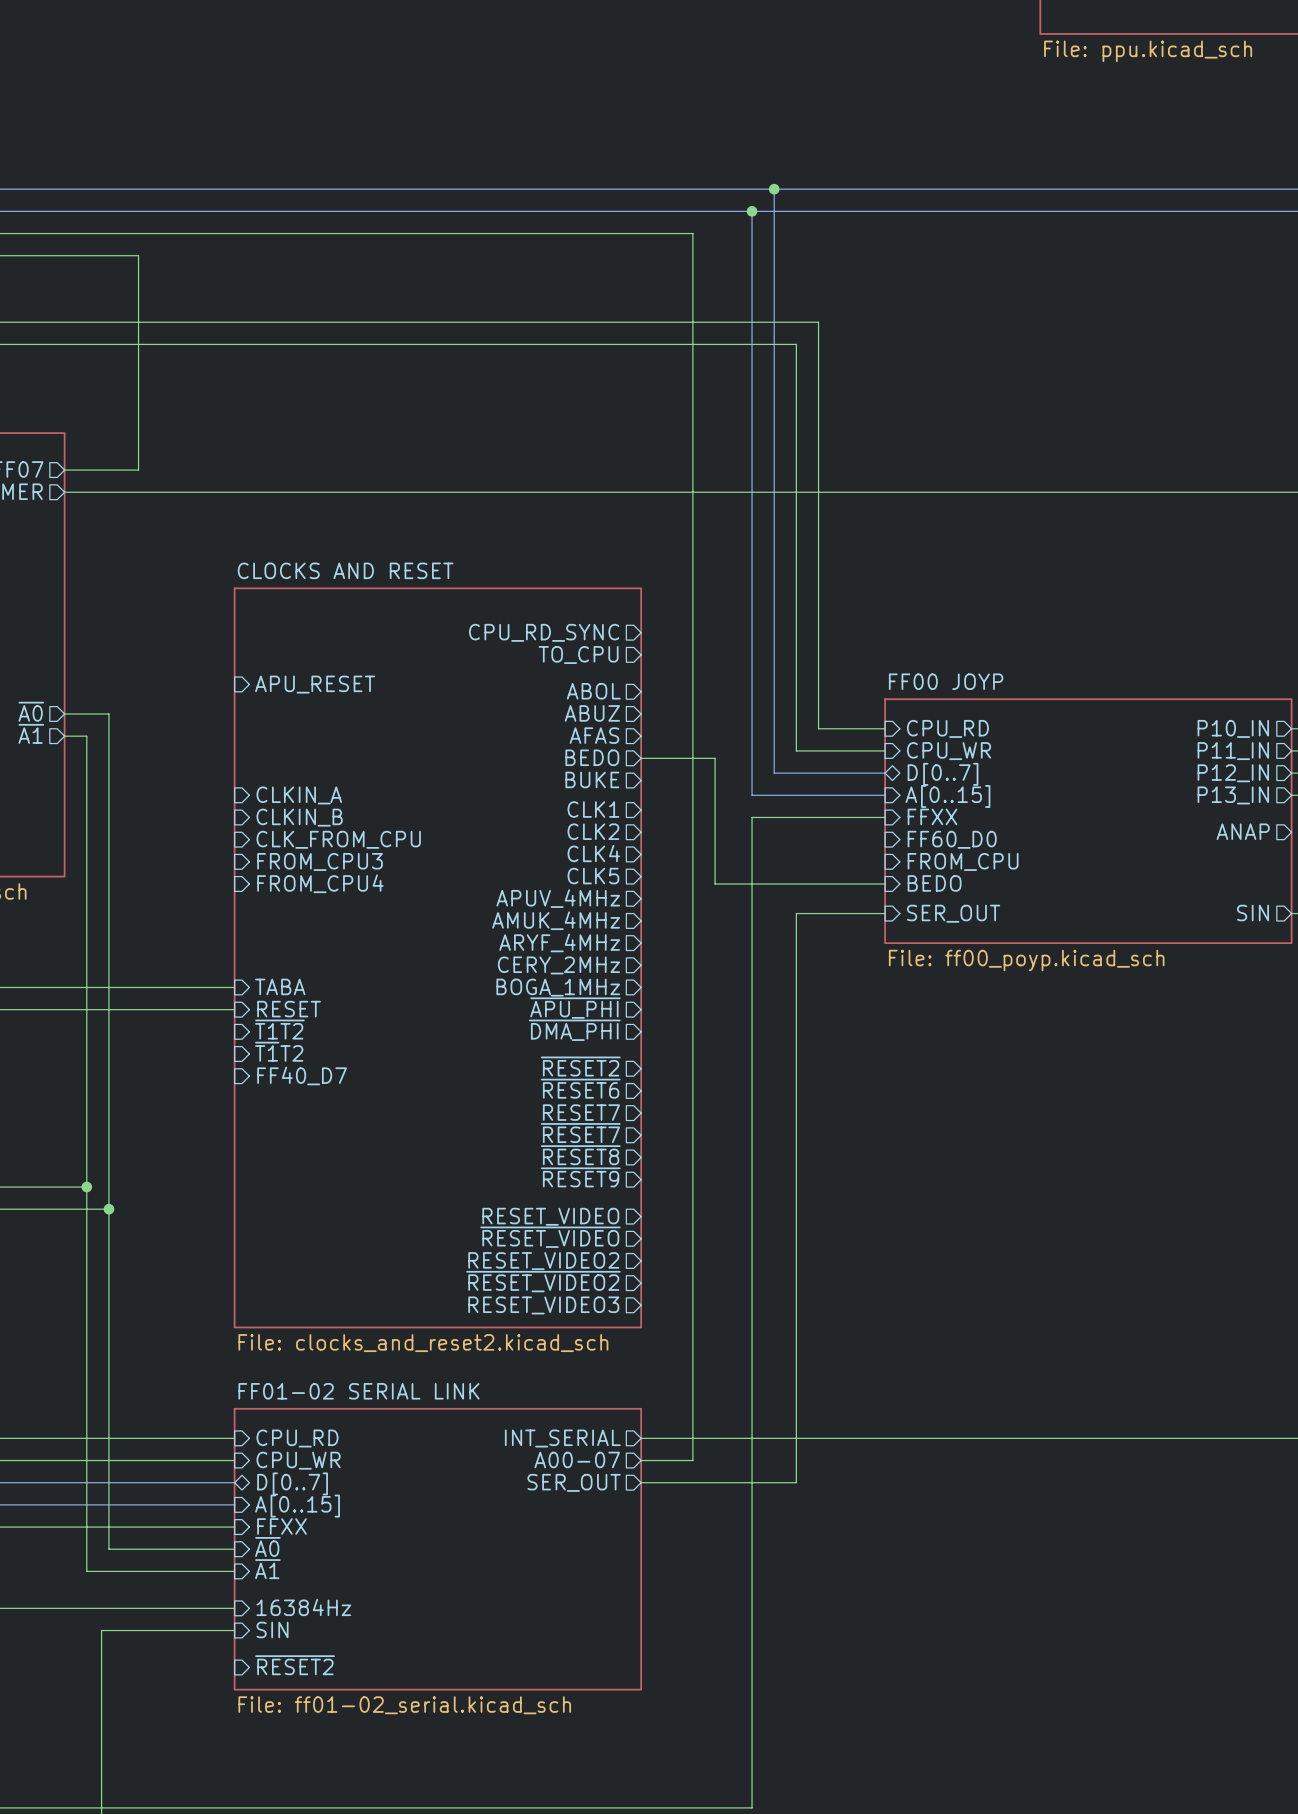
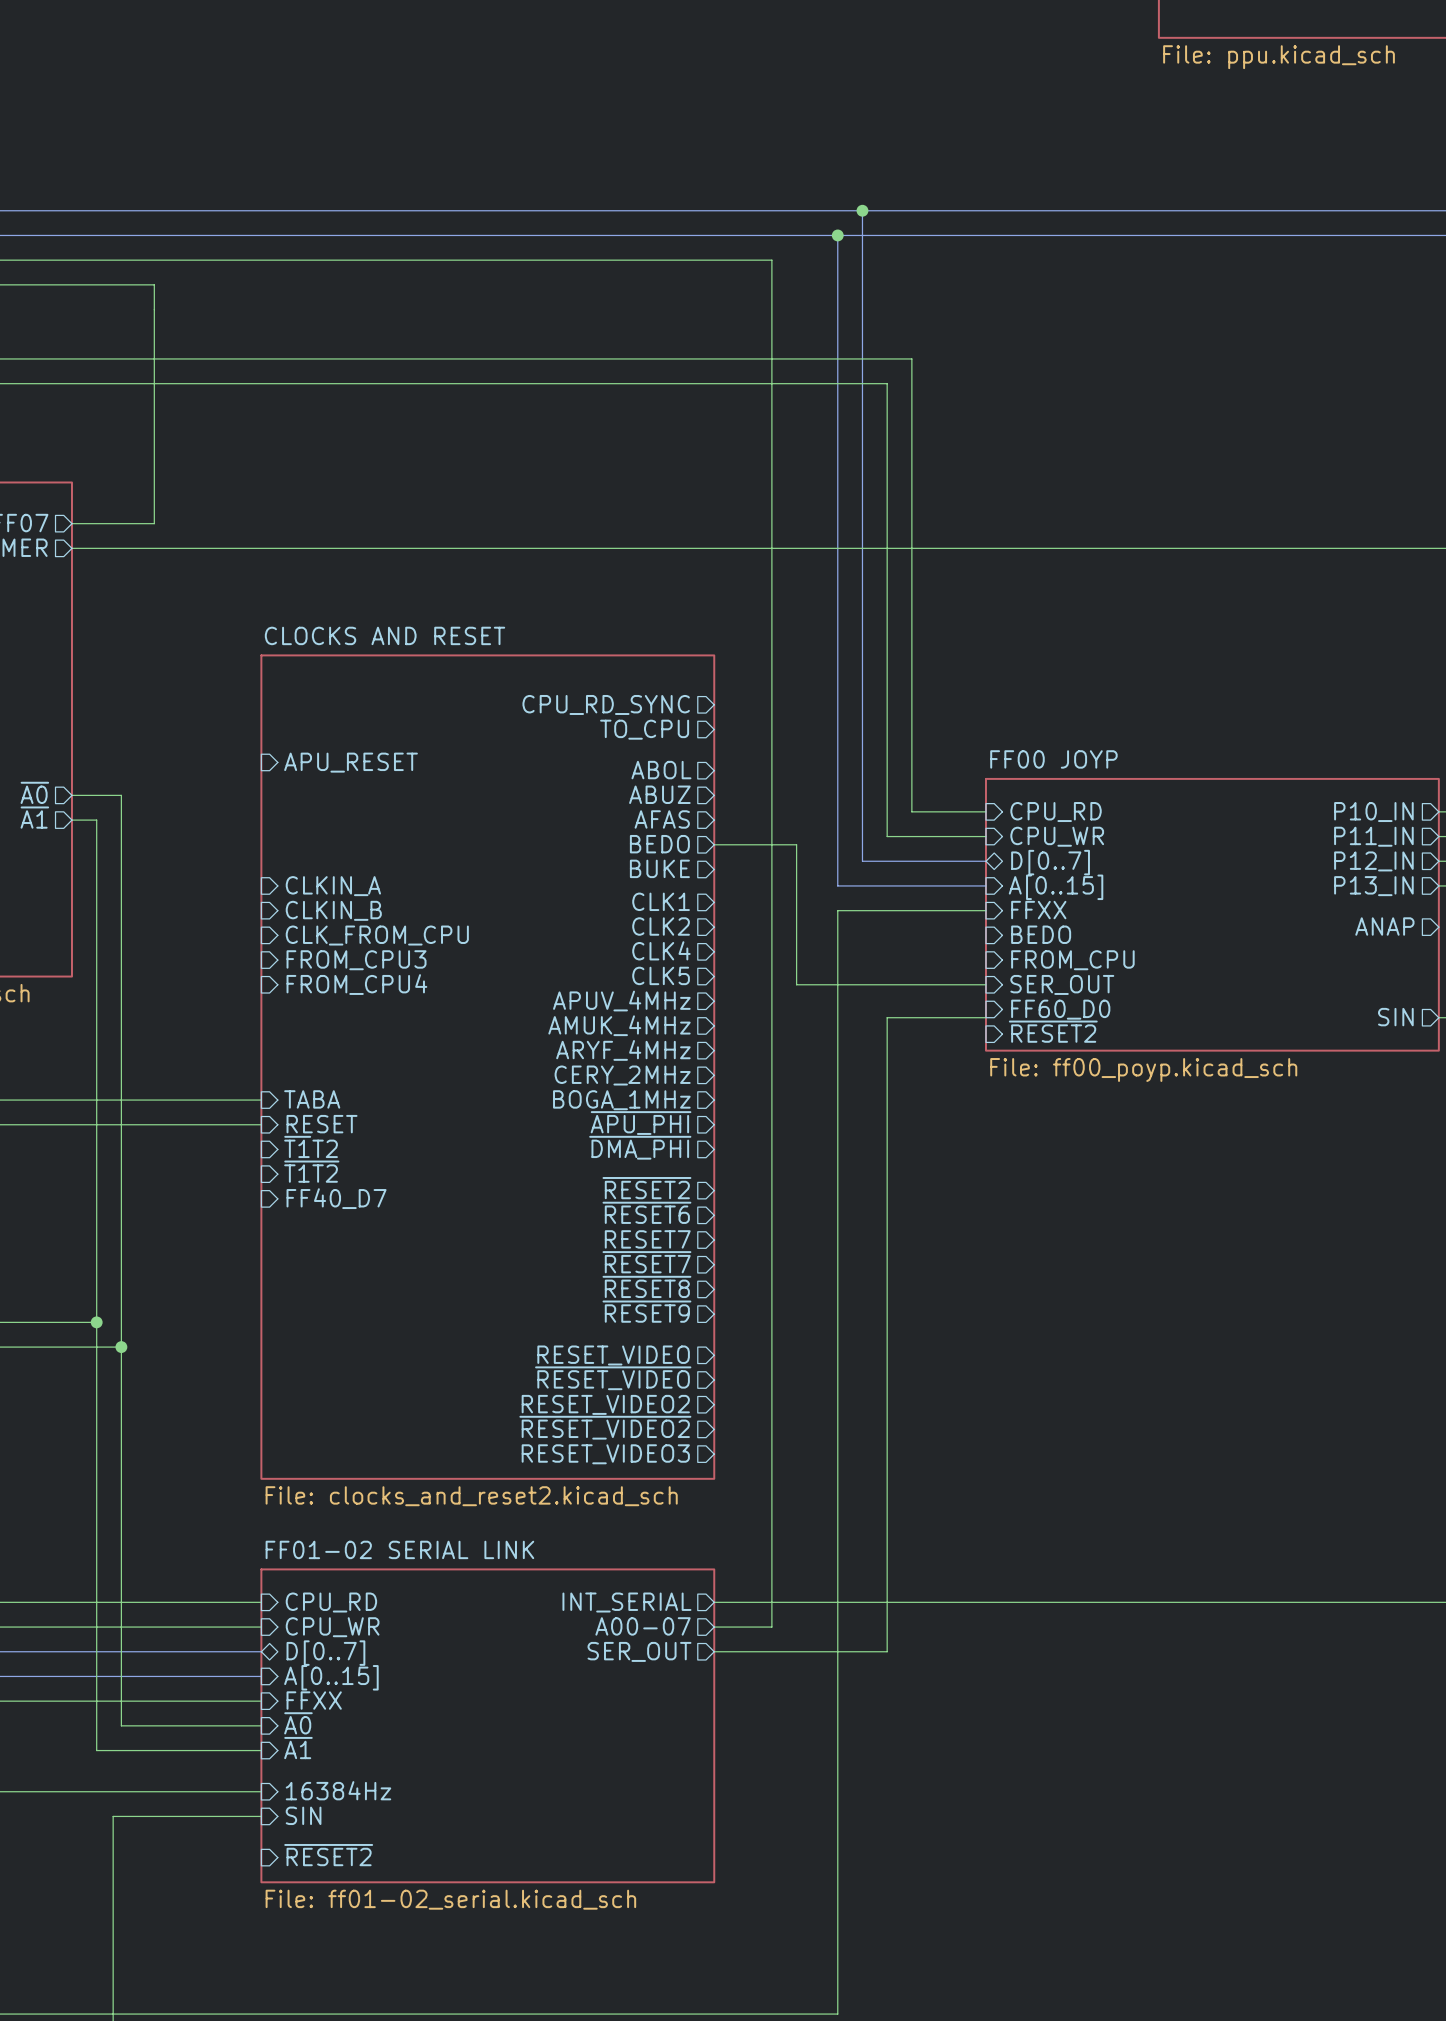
sheet pin: FF60_D0 (952, 839) -> BEDO (1041, 934)
sheet pin: BEDO (934, 883) -> SER_OUT (1062, 984)
sheet pin: none -> FF60_D0 (1060, 1009)
sheet pin: SER_OUT (953, 913) -> none
sheet pin: none -> ~{RESET2} (1053, 1031)
sheet pin: ~{T1T2} (279, 1029) -> ~{T1}T2 (311, 1146)
sheet pin: ~{T1}T2 (279, 1051) -> ~{T1T2} (311, 1171)

